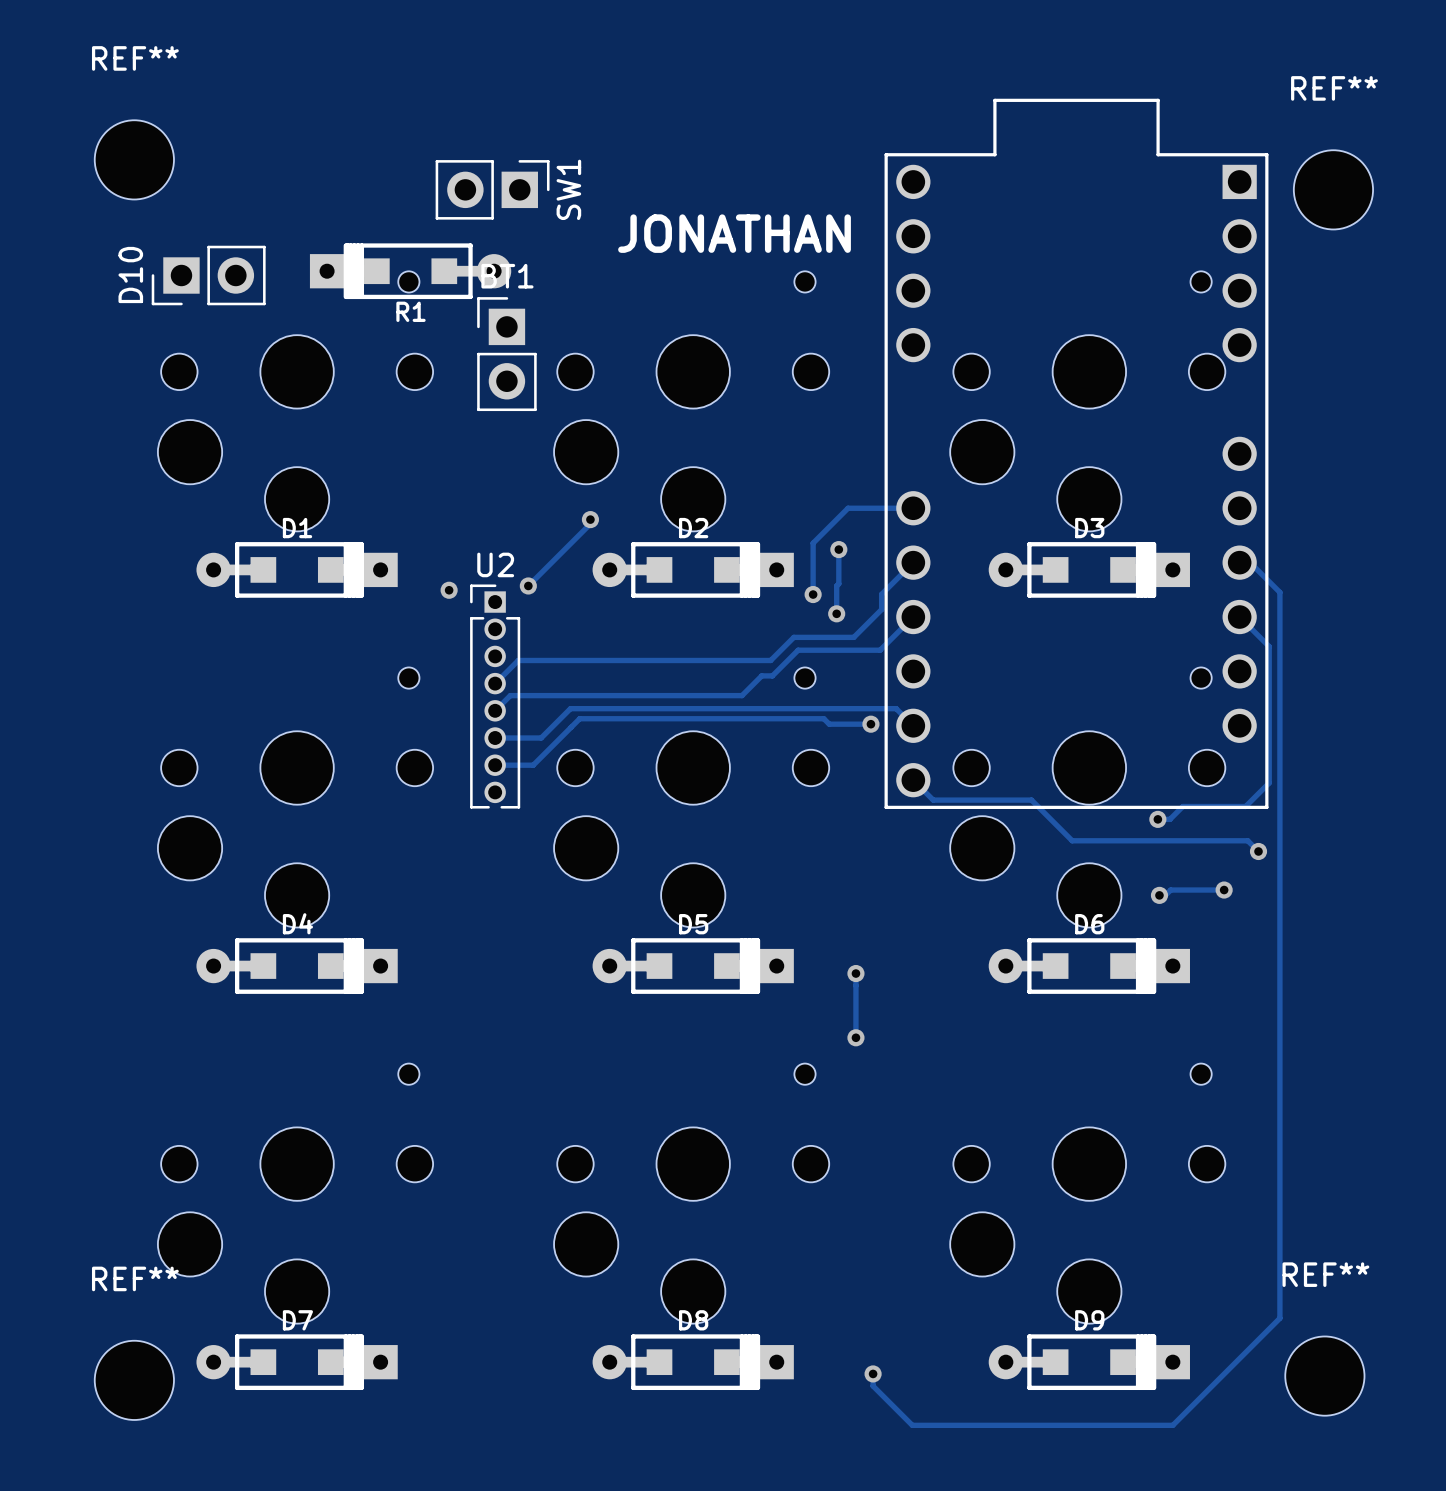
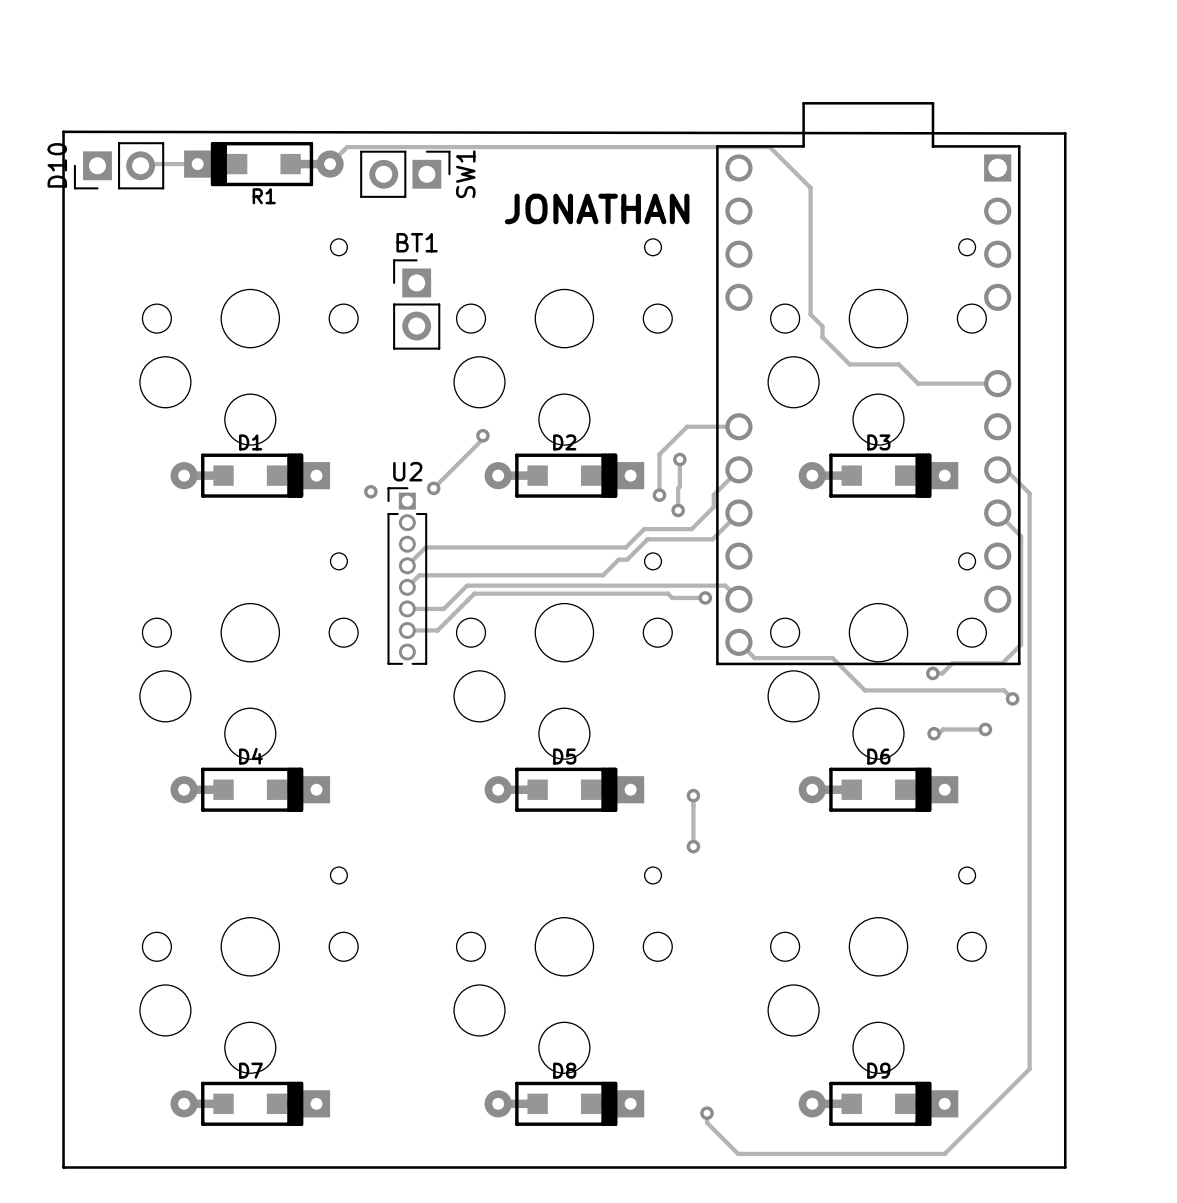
board edge: none -> (63, 131) (63, 1167) (1065, 1167) (1065, 133) (63, 131)
REF**: (134, 159) -> none
track: none -> (197, 164) (142, 164) (140, 165)
track: none -> (330, 164) (347, 147) (769, 147) (810, 187) (810, 314) (822, 326) (822, 337) (849, 364) (898, 364) (918, 383) (997, 383)
REF**: (1333, 189) -> none
R1 position: (410, 271) -> (263, 164)
D10 position: (208, 275) -> (119, 165)
REF**: (1324, 1376) -> none
REF**: (134, 1380) -> none

